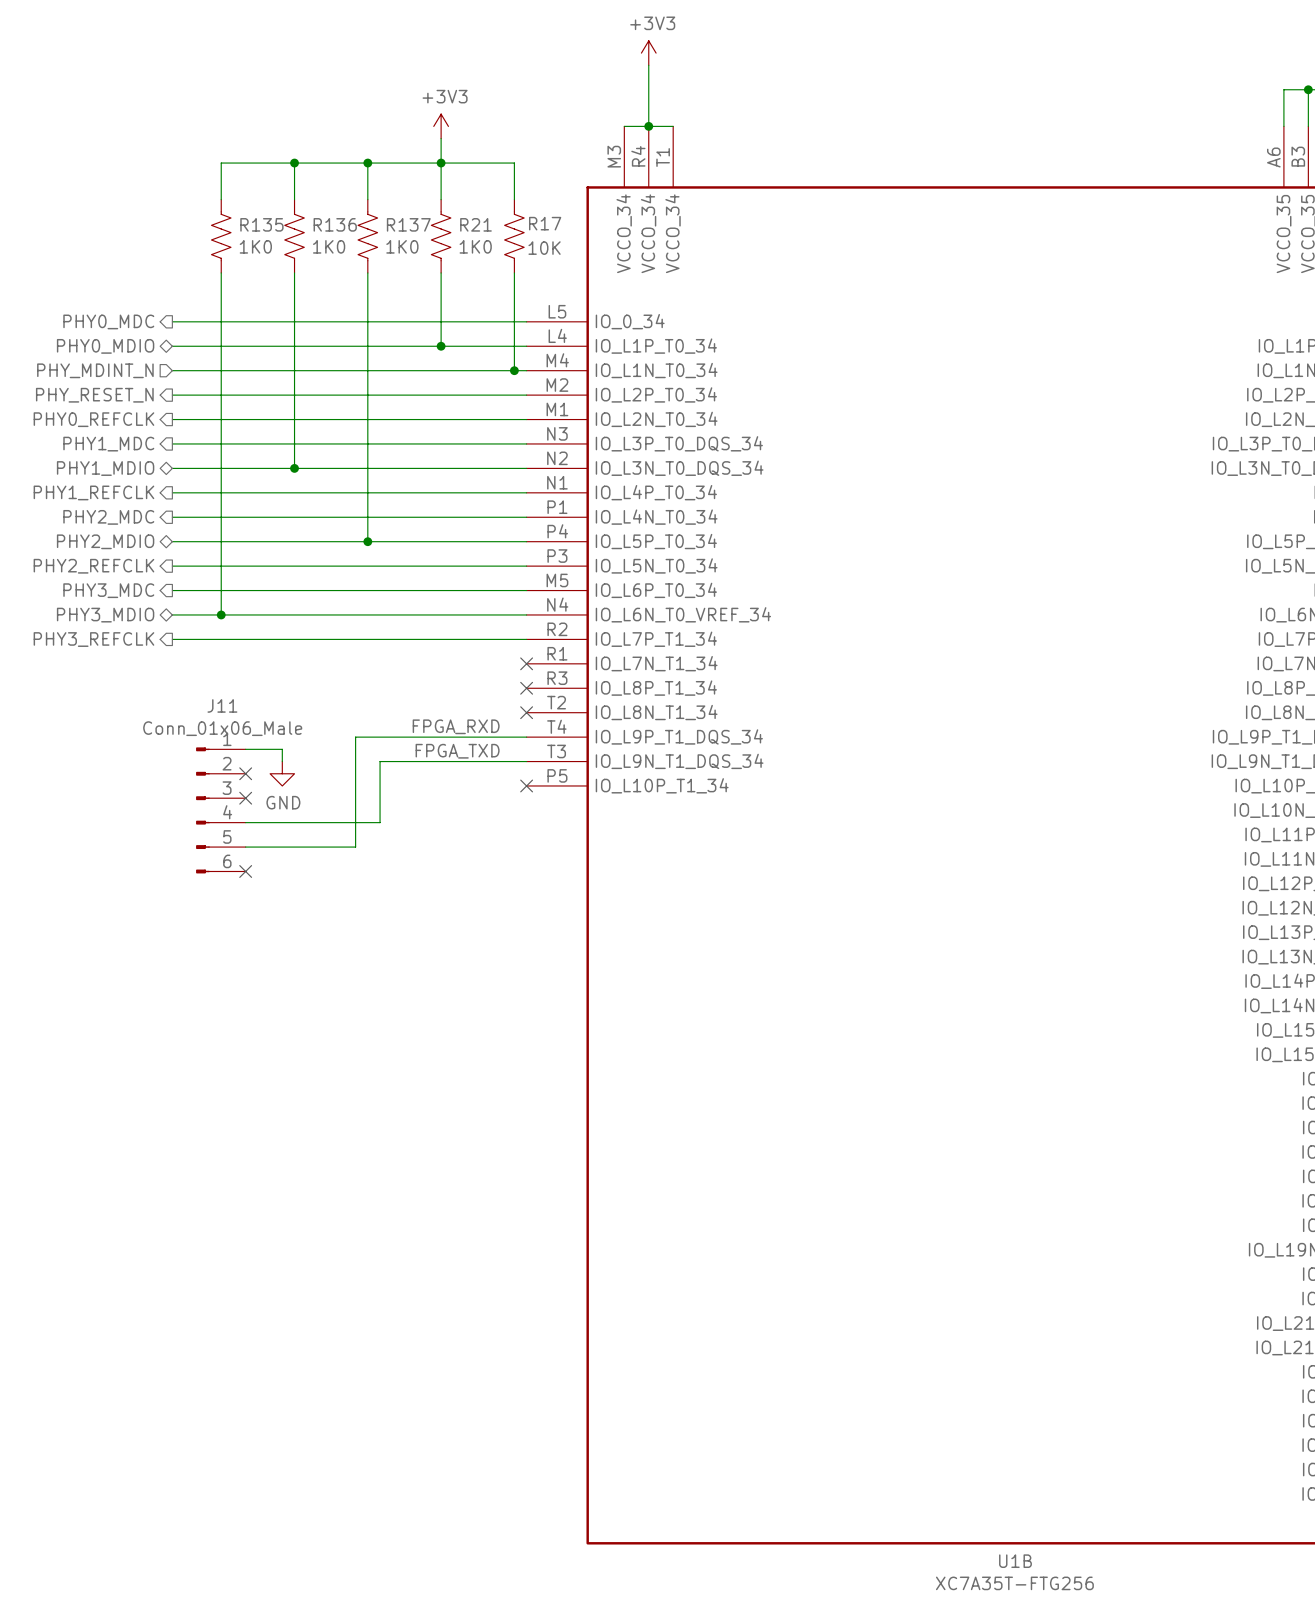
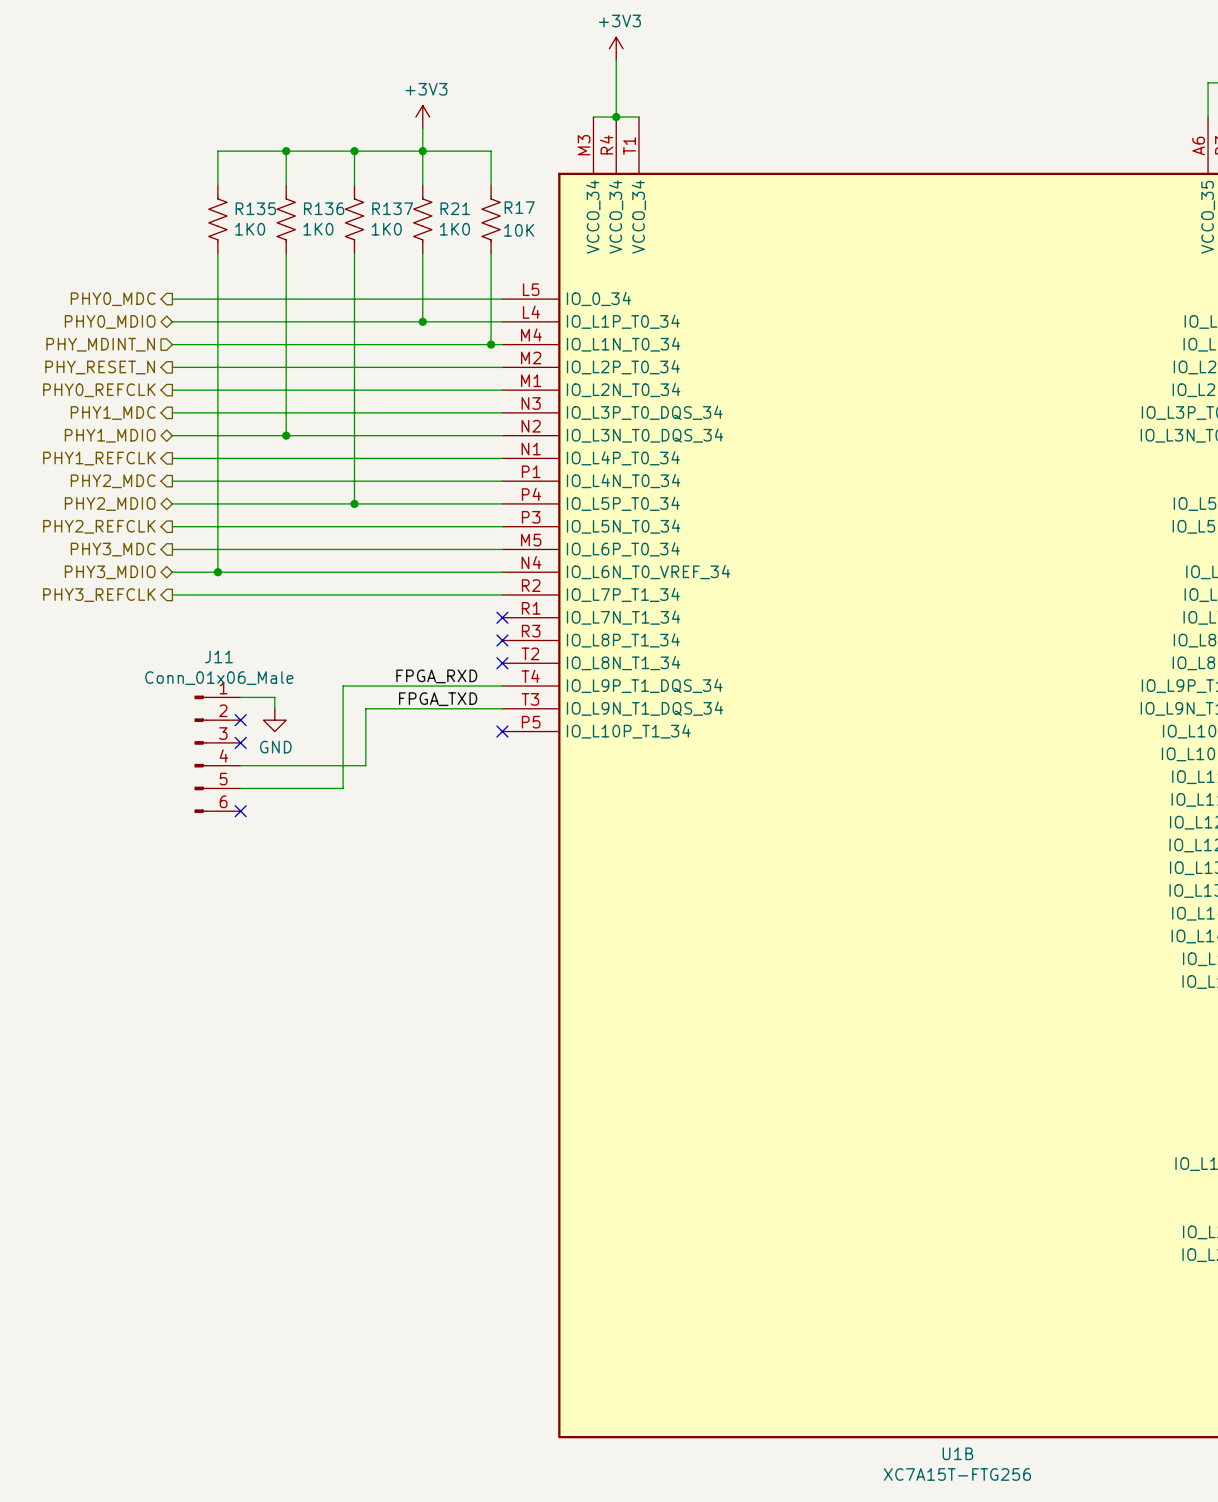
U1B value: XC7A35T-FTG256 (1014, 1583) -> XC7A15T-FTG256 (957, 1474)

